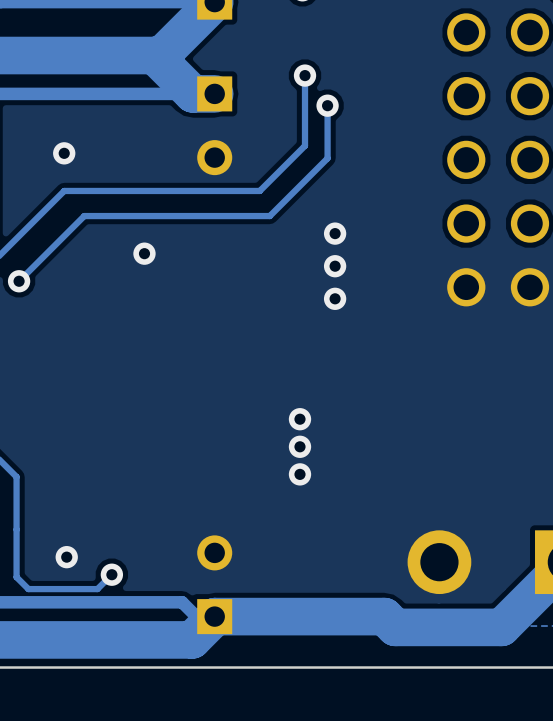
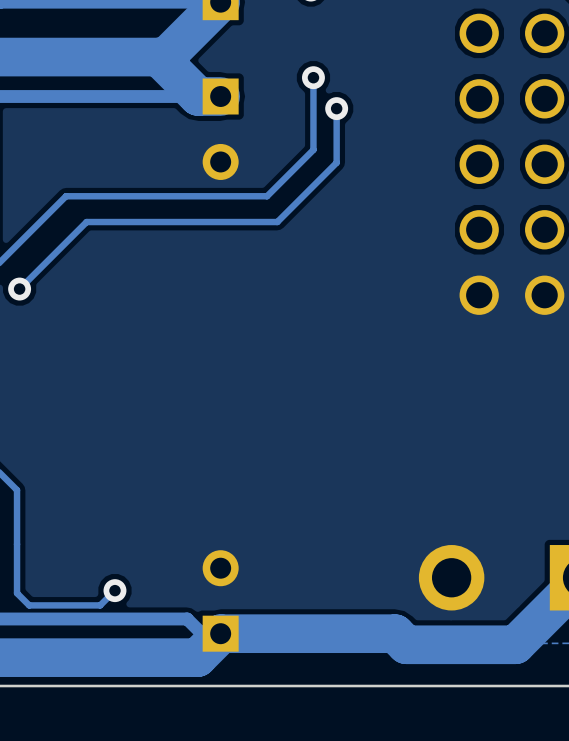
via: (64, 153) -> none
via: (335, 233) -> none
via: (144, 253) -> none
via: (335, 266) -> none
via: (335, 298) -> none
via: (299, 419) -> none
via: (299, 446) -> none
via: (299, 474) -> none
via: (66, 557) -> none

